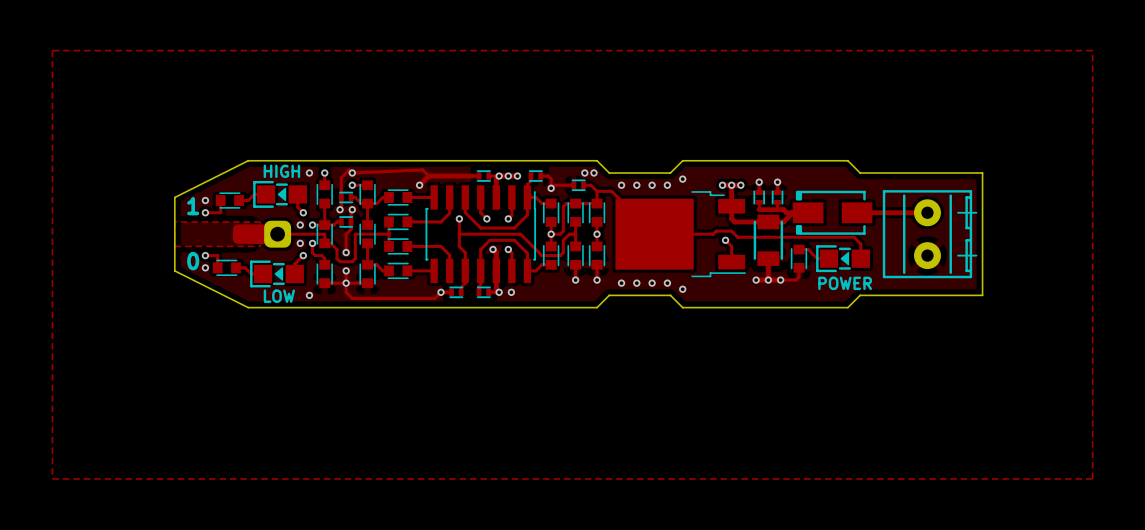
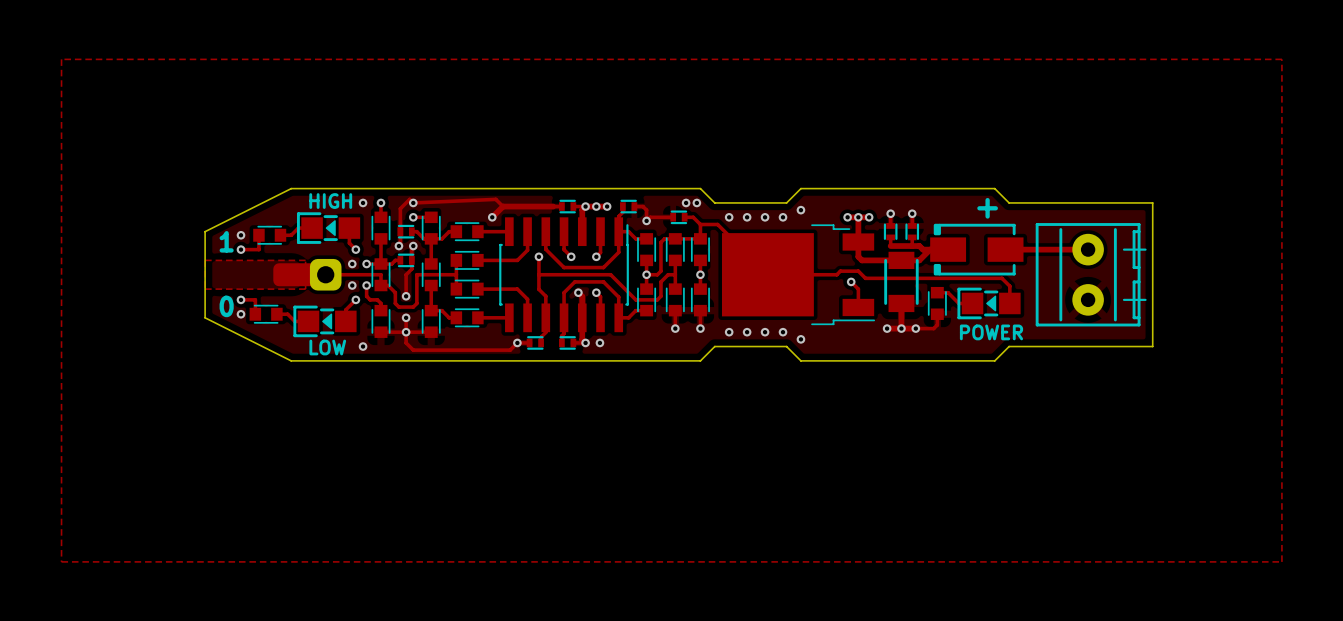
text: none -> + (987, 208)

